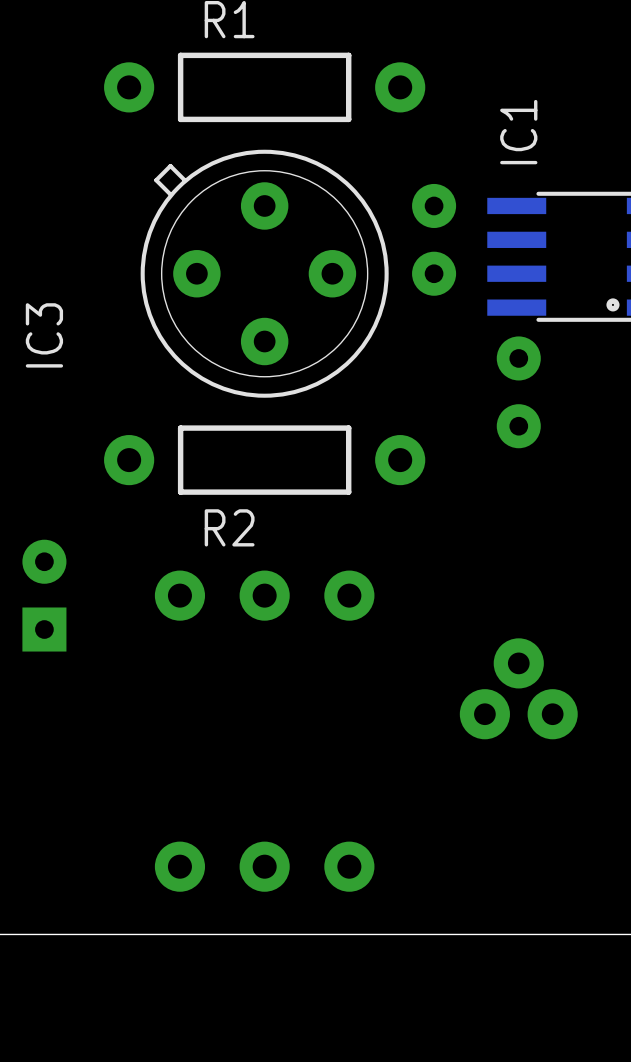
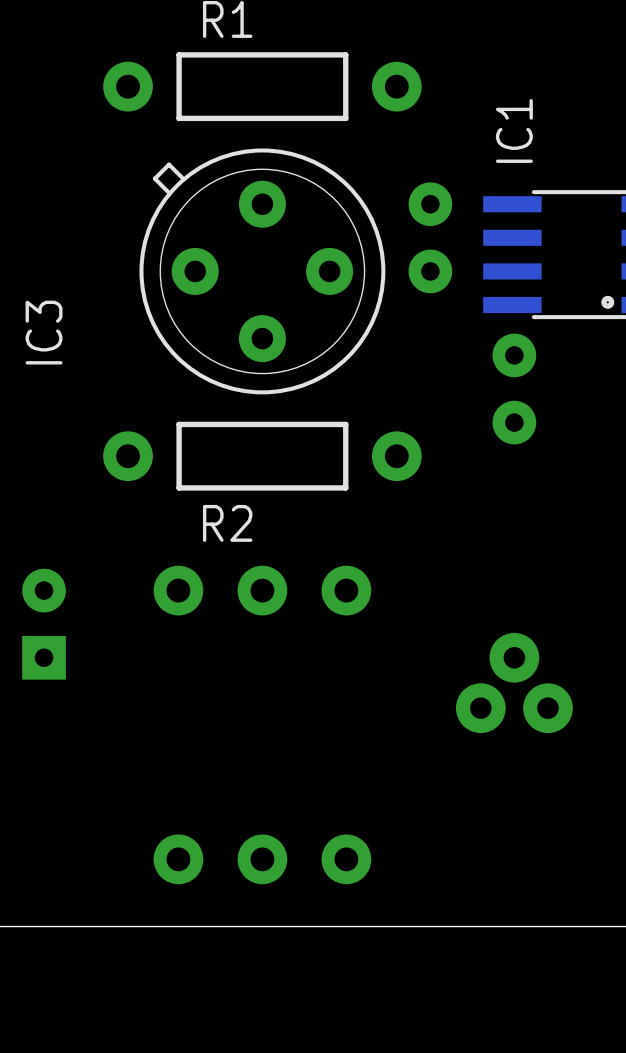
part position: (44, 595) -> (44, 624)

